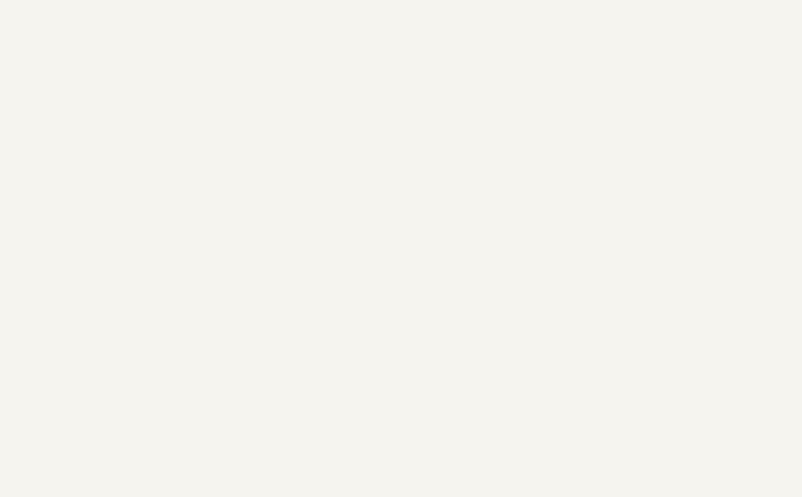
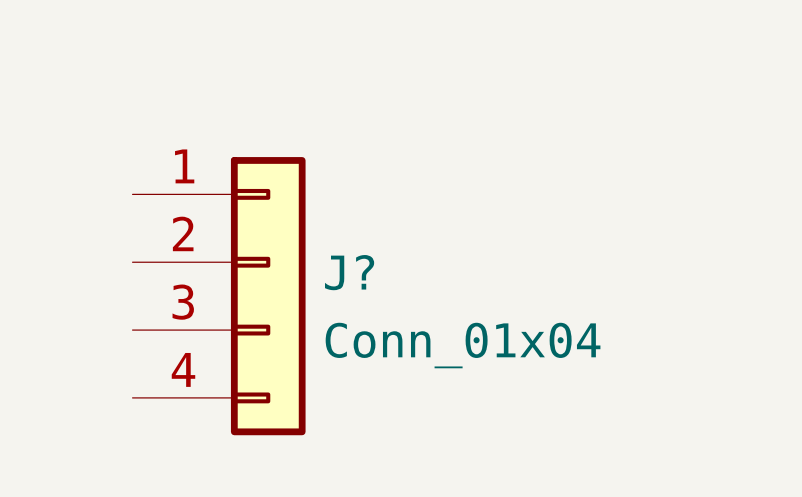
J?: none -> Conn_01x04 (219, 296)

